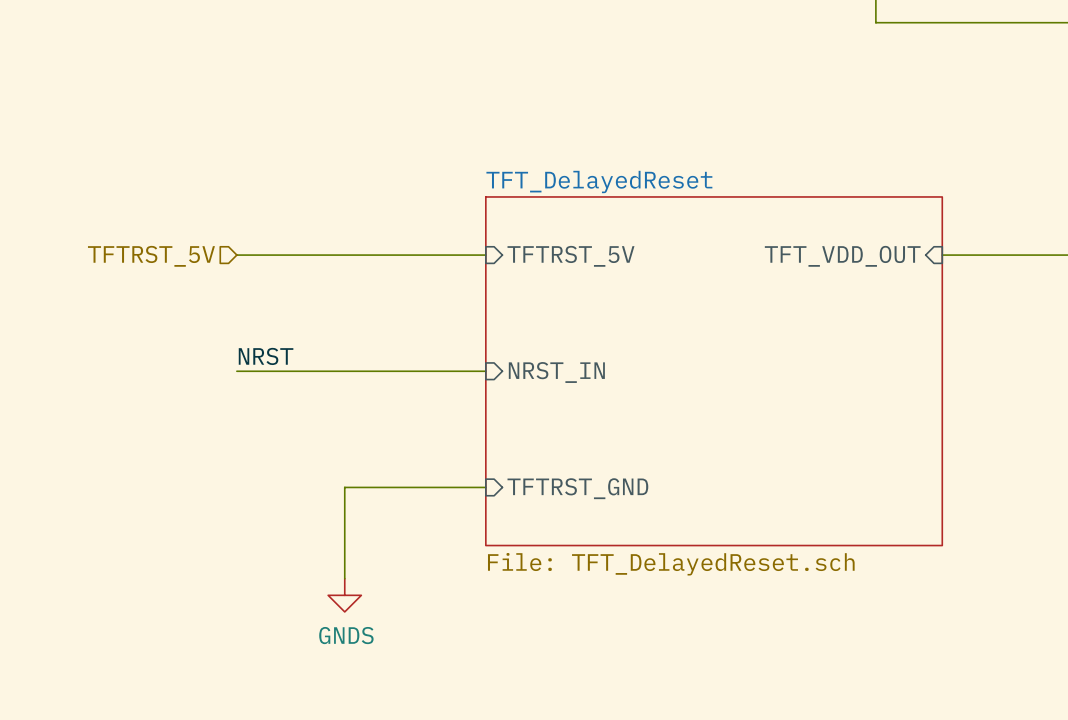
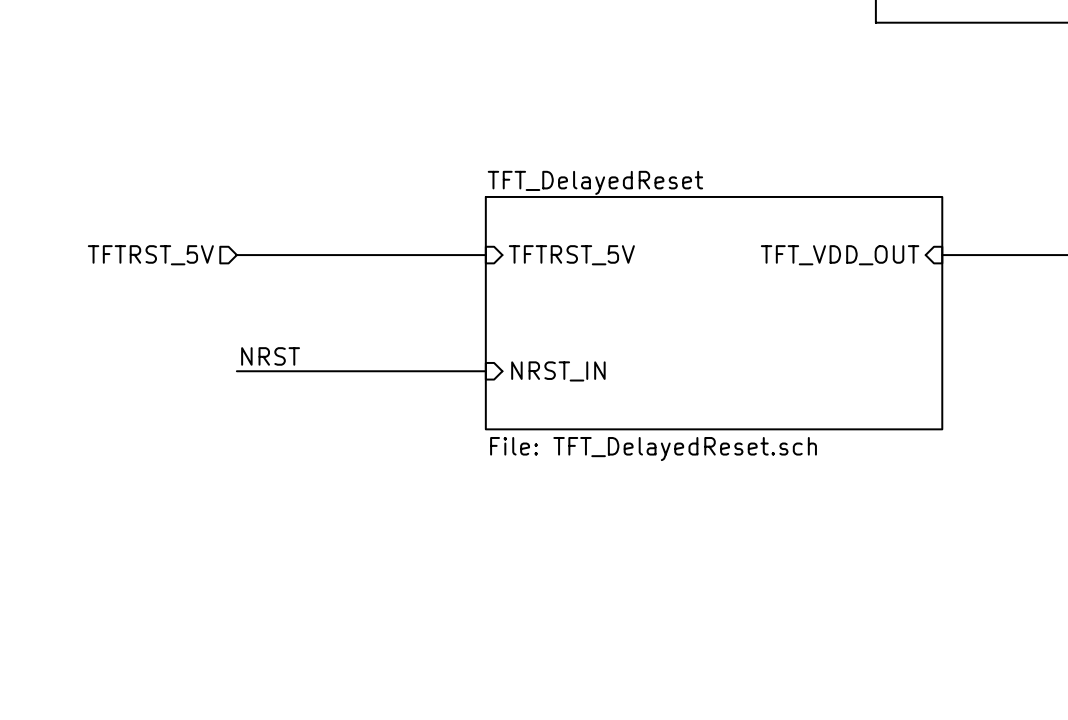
sheet TFT_DelayedReset: none -> File: TFT_DelayedReset.sch (714, 313)
sheet TFT_DelayedReset: File: TFT_DelayedReset.sch (714, 371) -> none
wire: (485, 487) (344, 487) (344, 578) -> none
sheet pin: TFTRST_GND (577, 488) -> none
power symbol: GNDS (344, 595) -> none

